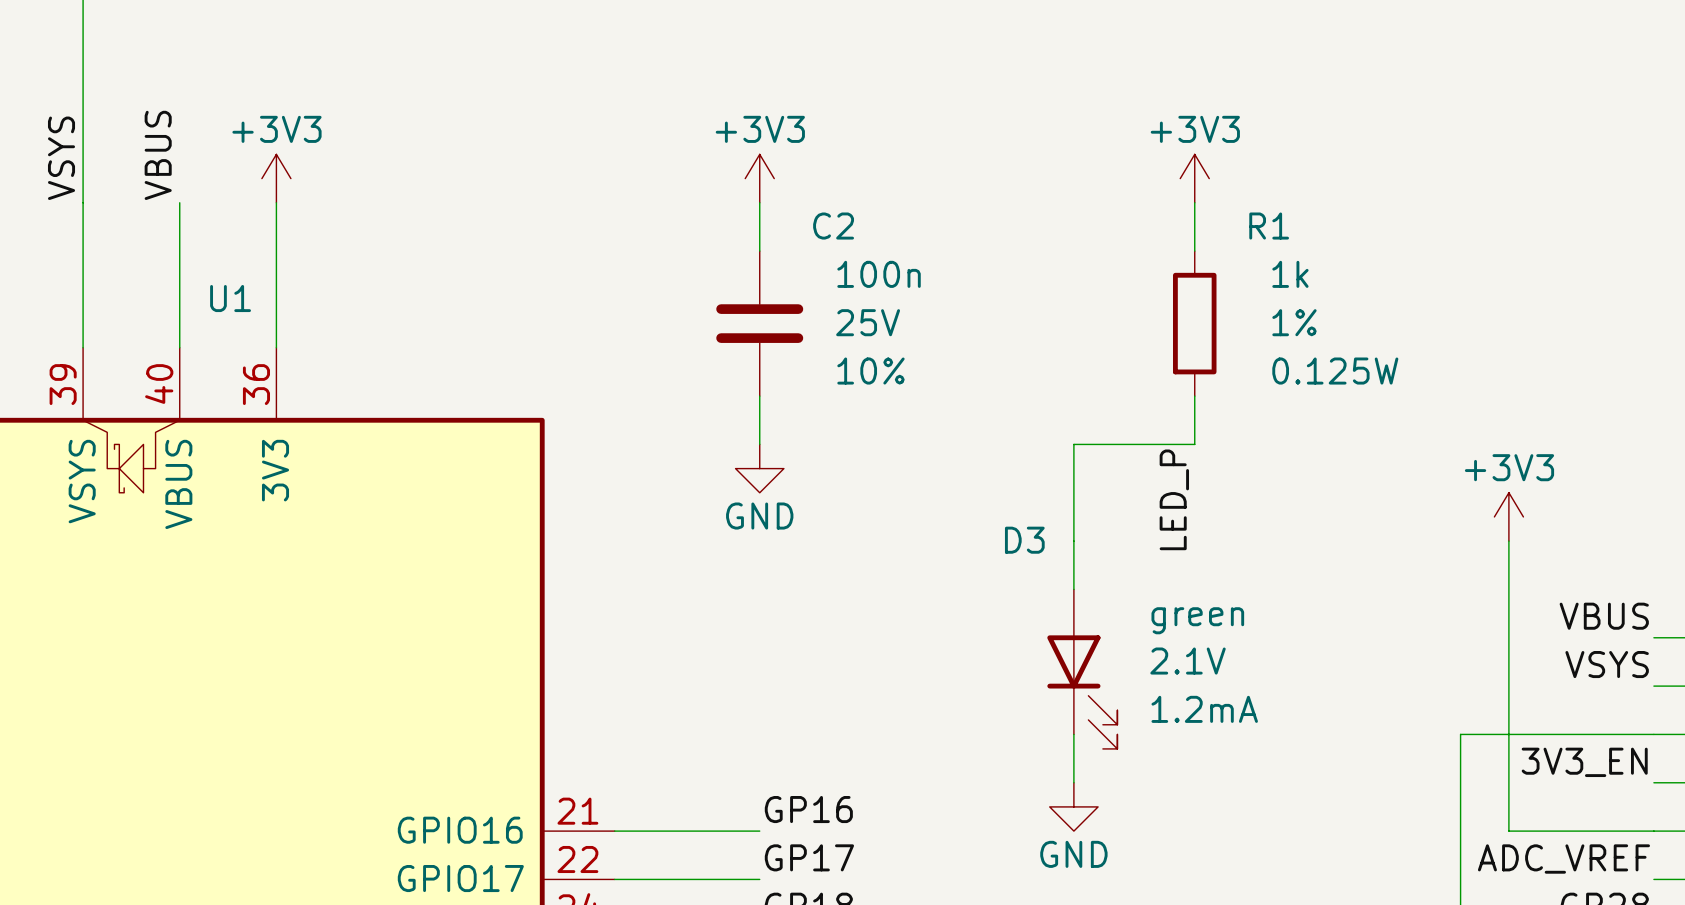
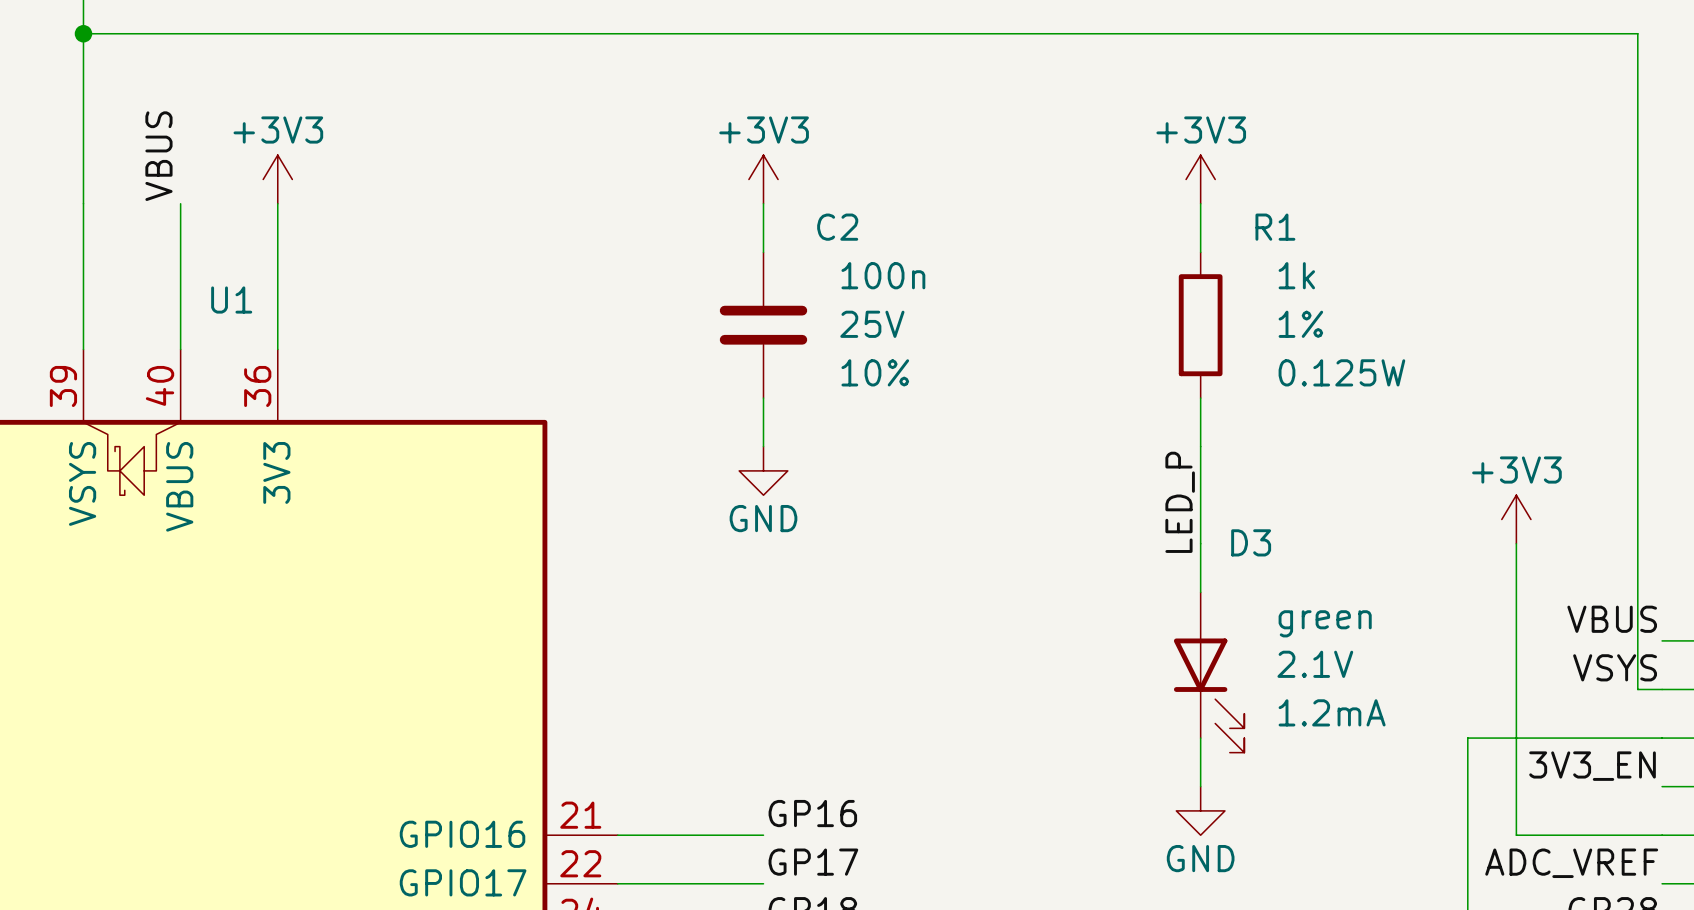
wire: none -> (83, 33) (1637, 33) (1637, 689) (1662, 689)
junction: none -> (83, 33)
label: VSYS (61, 158) -> none
wire: (1194, 444) (1073, 444) (1073, 589) -> (1200, 446) (1200, 592)
D3 name position: D3 (1024, 540) -> D3 (1251, 542)
D3 position: (1082, 669) -> (1209, 672)
wire: (1073, 734) (1073, 782) -> (1200, 738) (1200, 786)
power symbol position: GND (1073, 806) -> GND (1200, 810)

